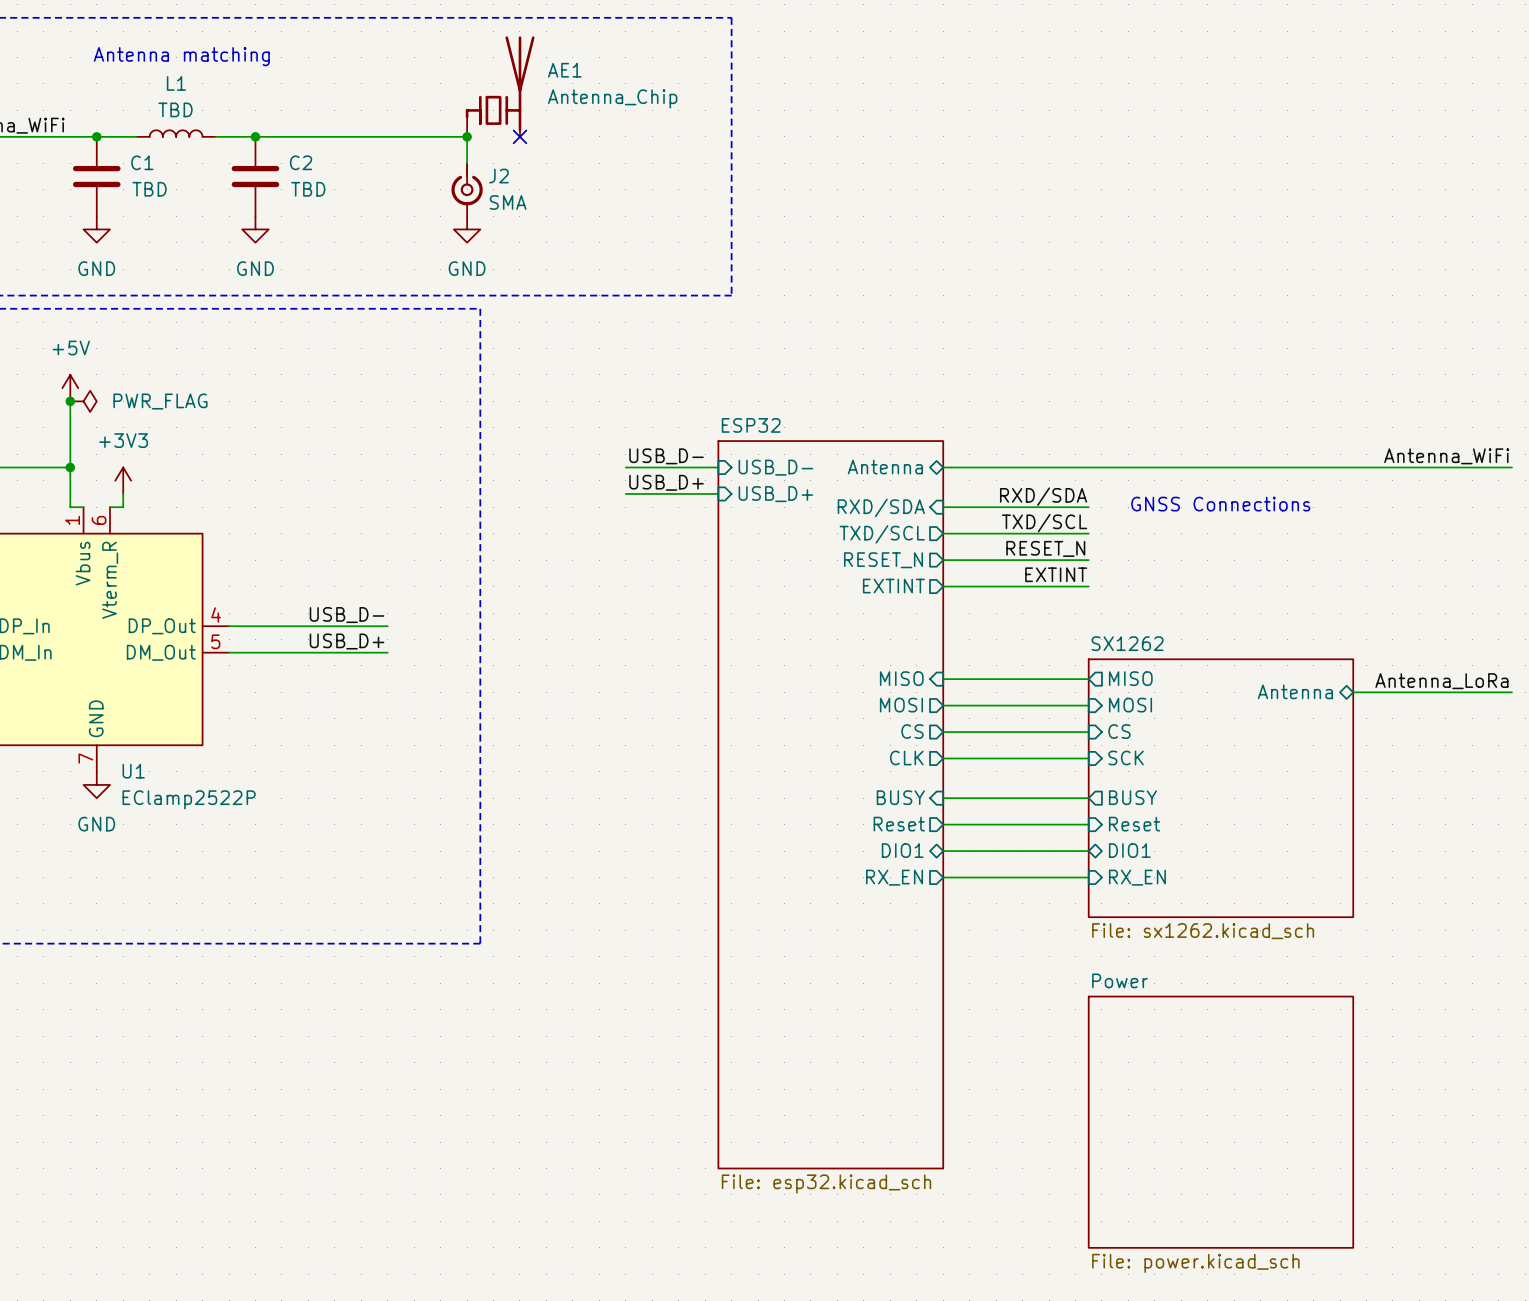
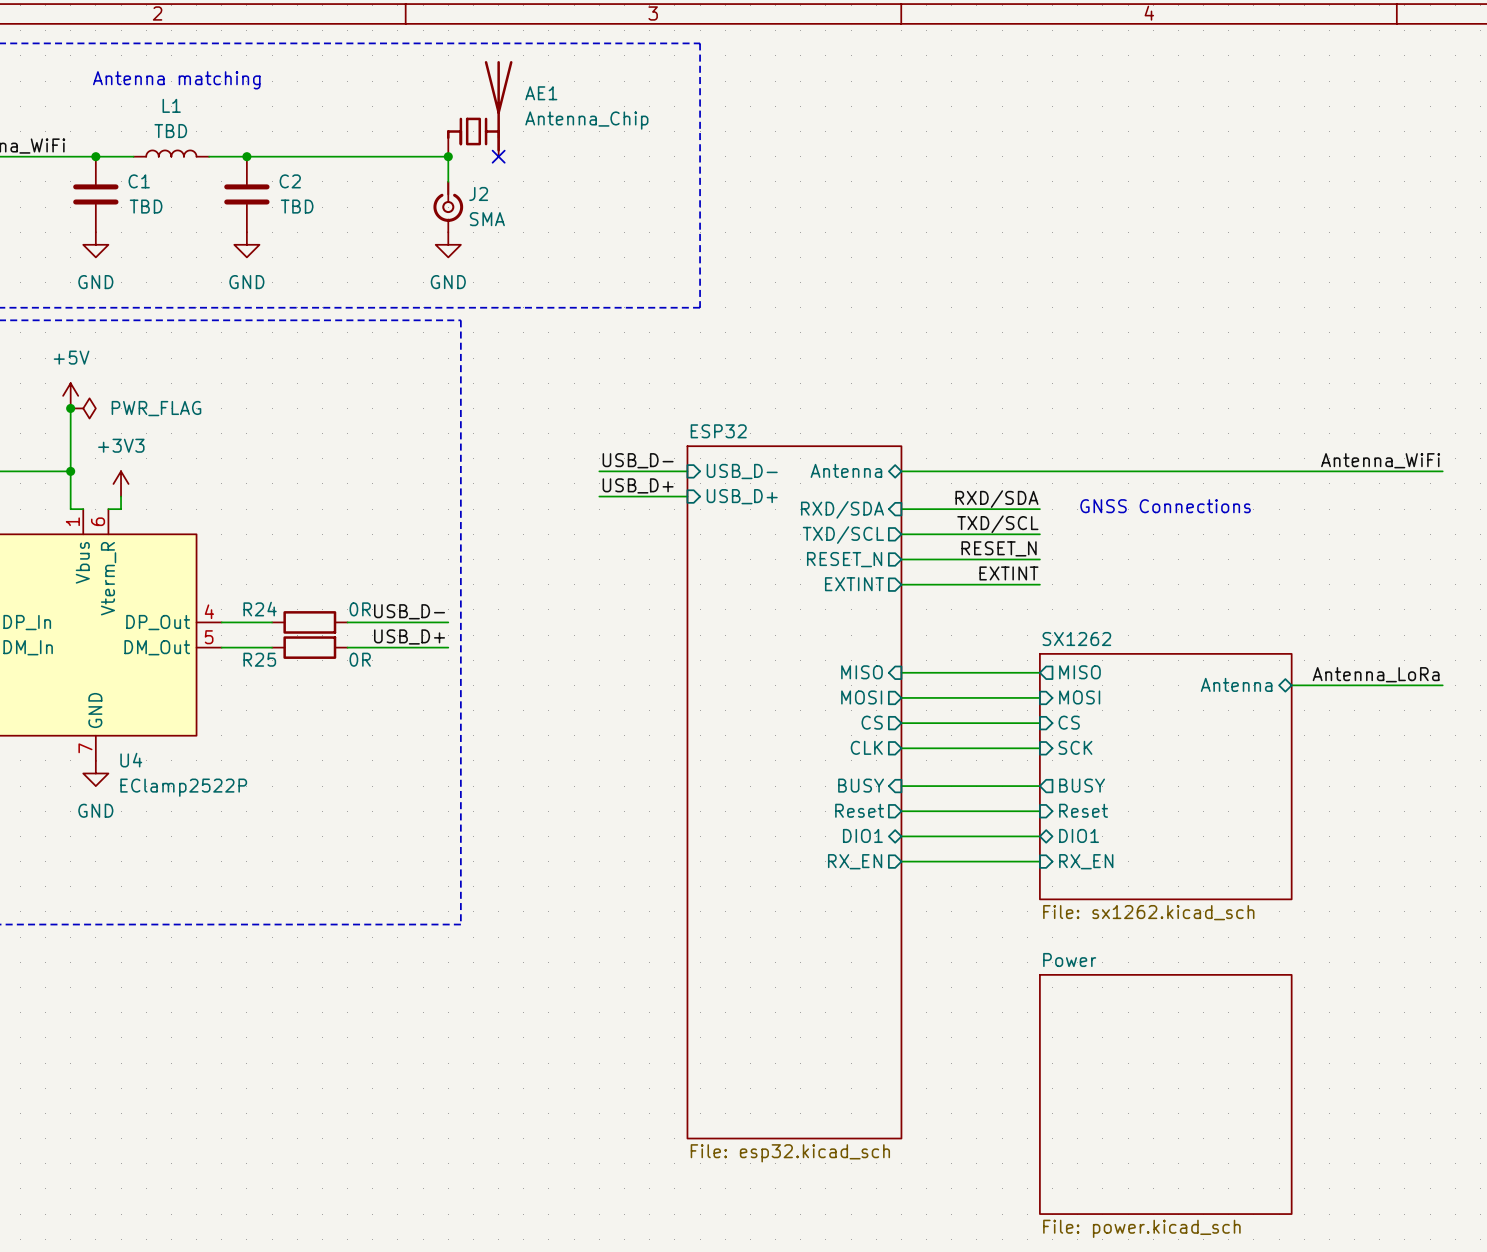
label position: USB_D- (347, 615) -> USB_D- (409, 611)
wire: (281, 626) (361, 626) -> (372, 622) (448, 622)
R24: none -> 0R (309, 622)
label position: USB_D+ (347, 641) -> USB_D+ (409, 636)
wire: (281, 652) (361, 652) -> (372, 647) (448, 647)
R25: none -> 0R (309, 647)
U1 name: U1 (133, 771) -> U4 (131, 760)

